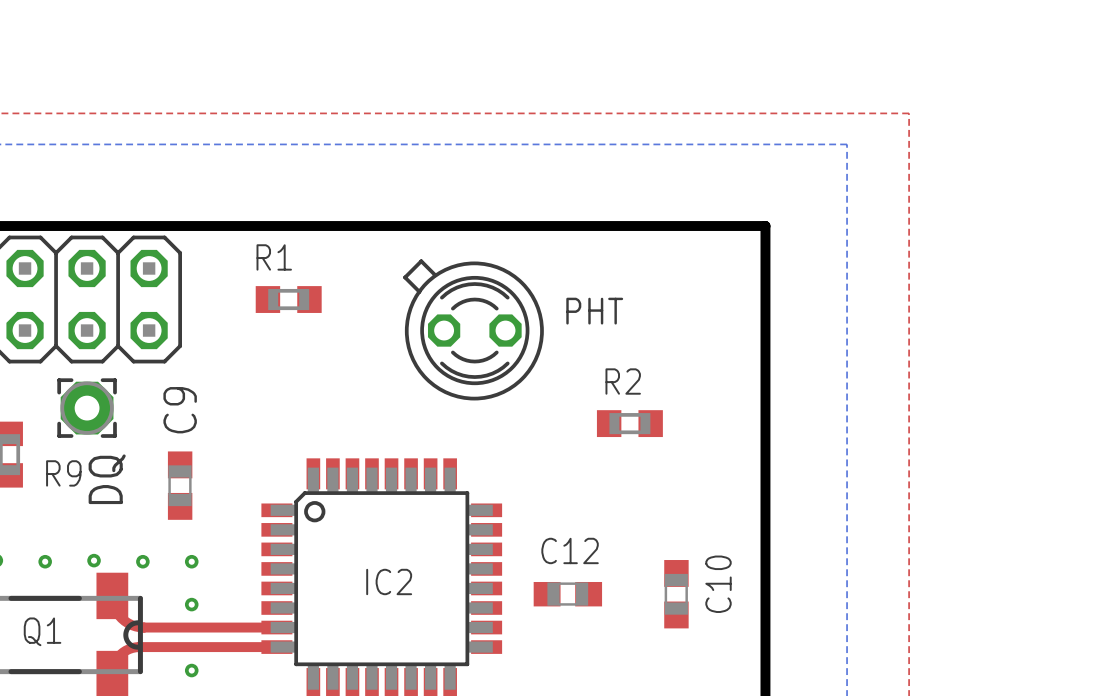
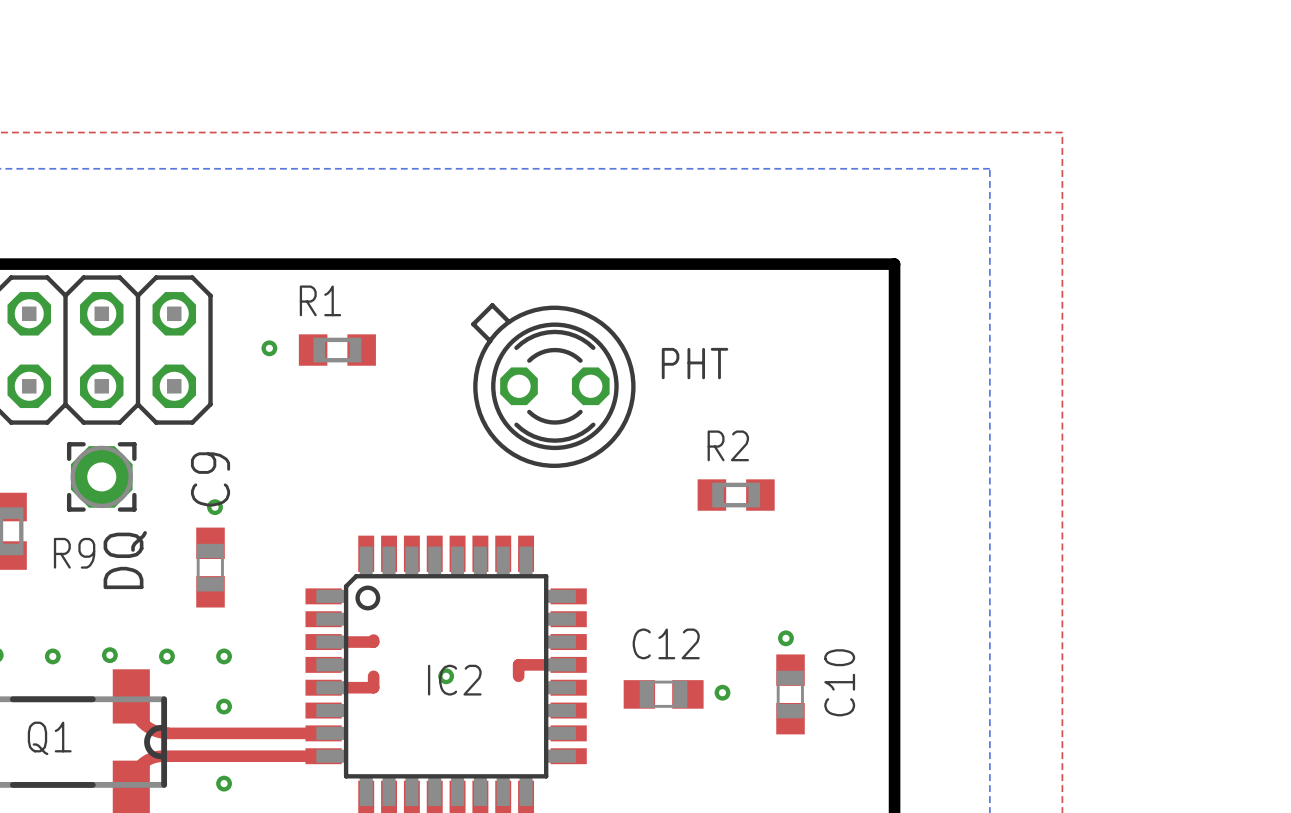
via: none -> (269, 348)
via: none -> (215, 507)
via: none -> (785, 638)
top track: none -> (373, 640) (373, 642) (323, 642)
top track: none -> (568, 664) (518, 664) (518, 676)
top track: none -> (373, 676) (373, 687) (323, 687)
via: none -> (446, 676)
via: none -> (722, 692)

